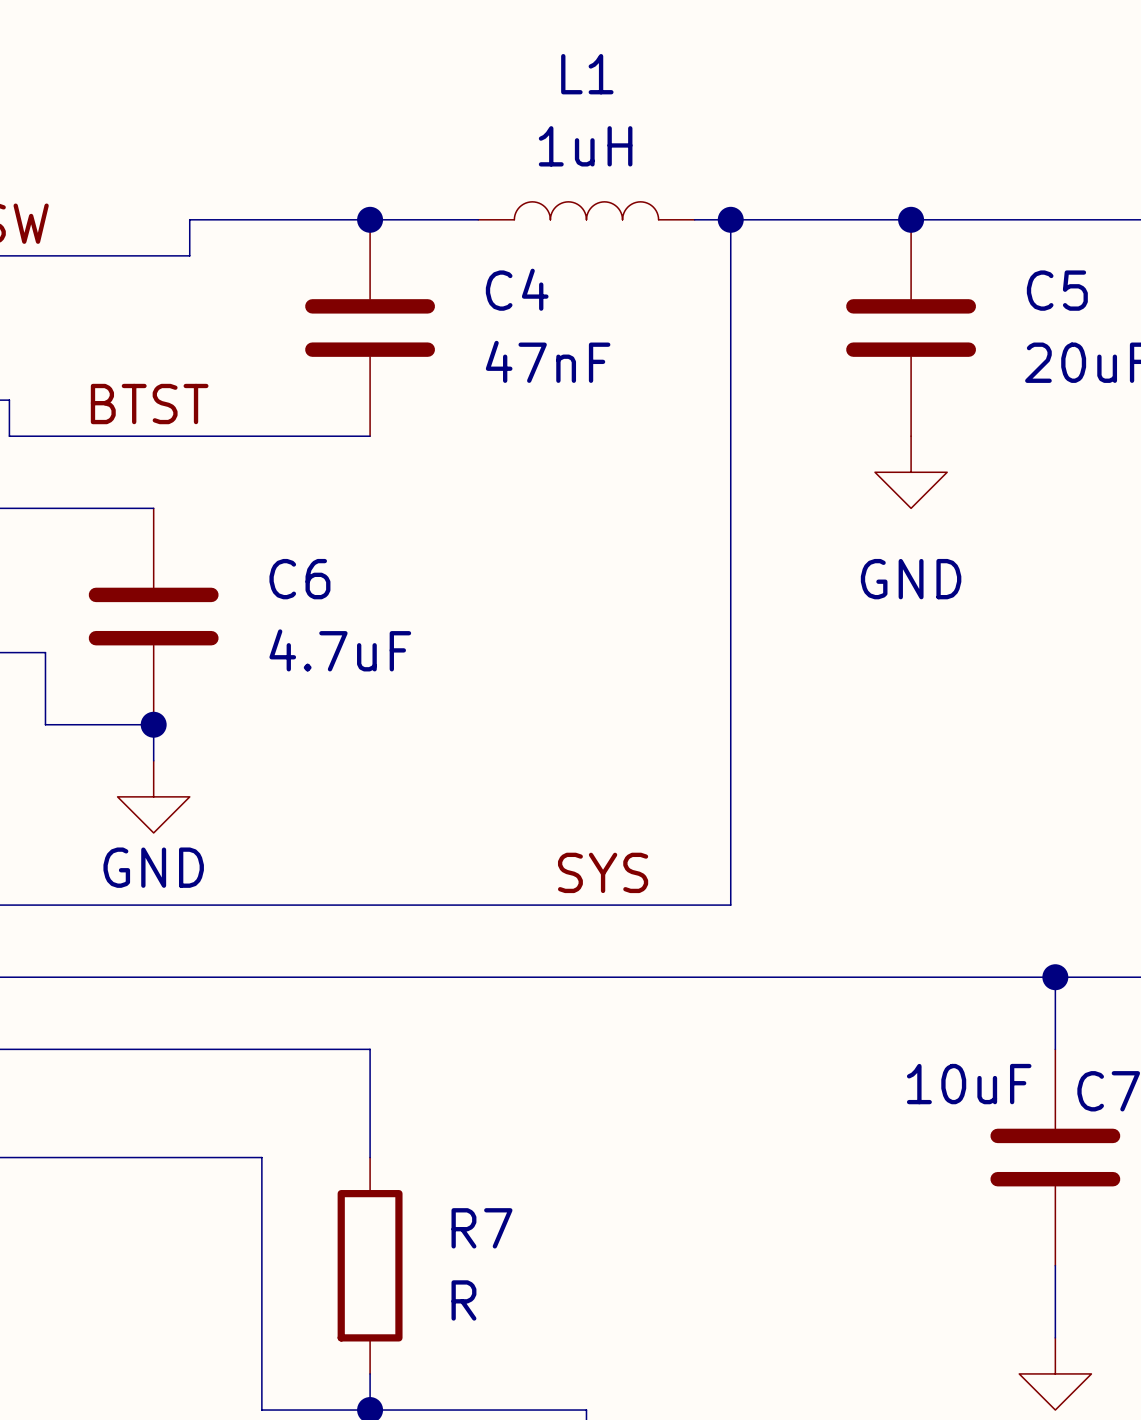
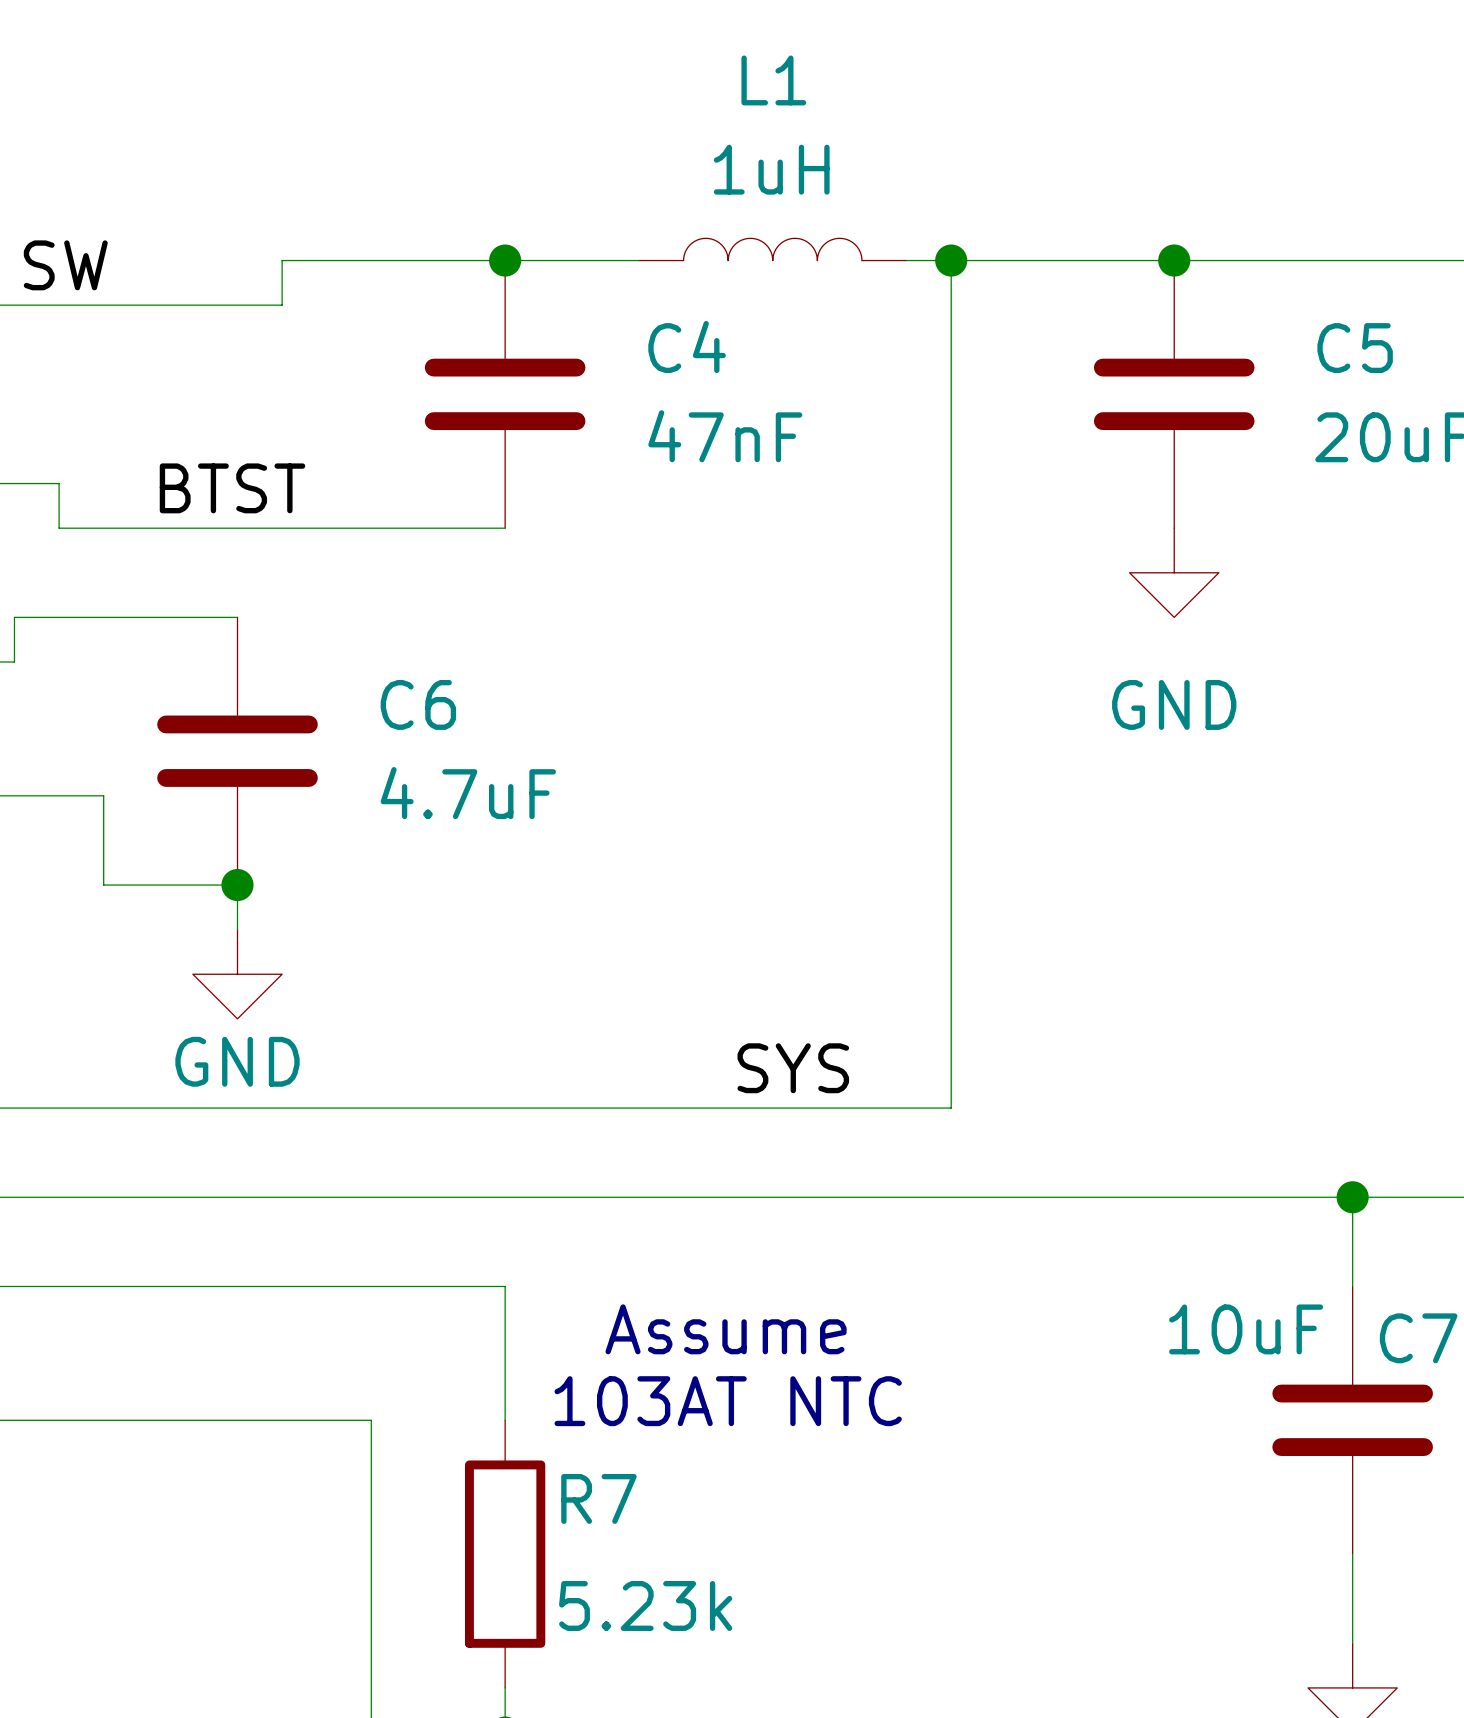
text: none -> Assume (726, 1329)
text: none -> 103AT NTC (728, 1401)
R7 name position: R7 (481, 1228) -> R7 (598, 1498)
R7 value: R (463, 1300) -> 5.23k (645, 1605)

